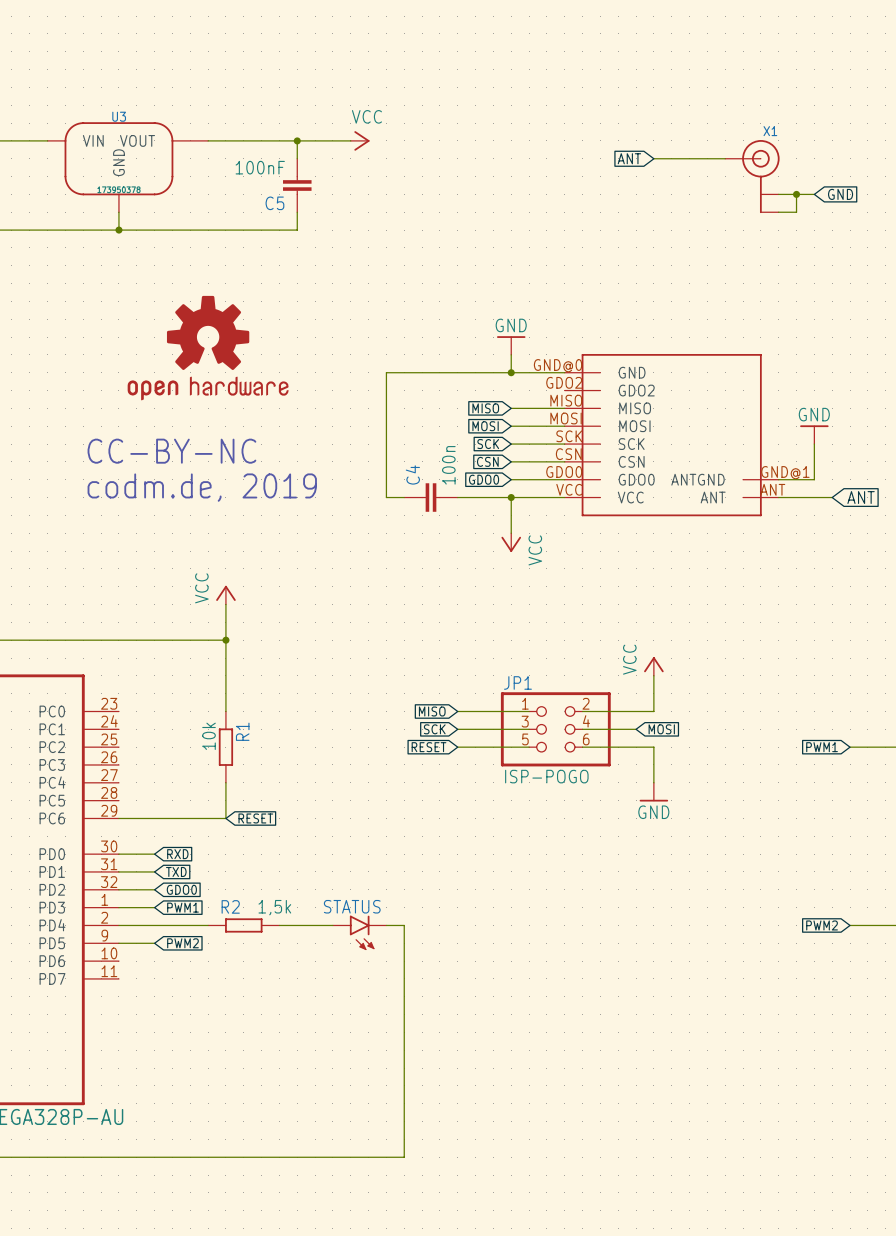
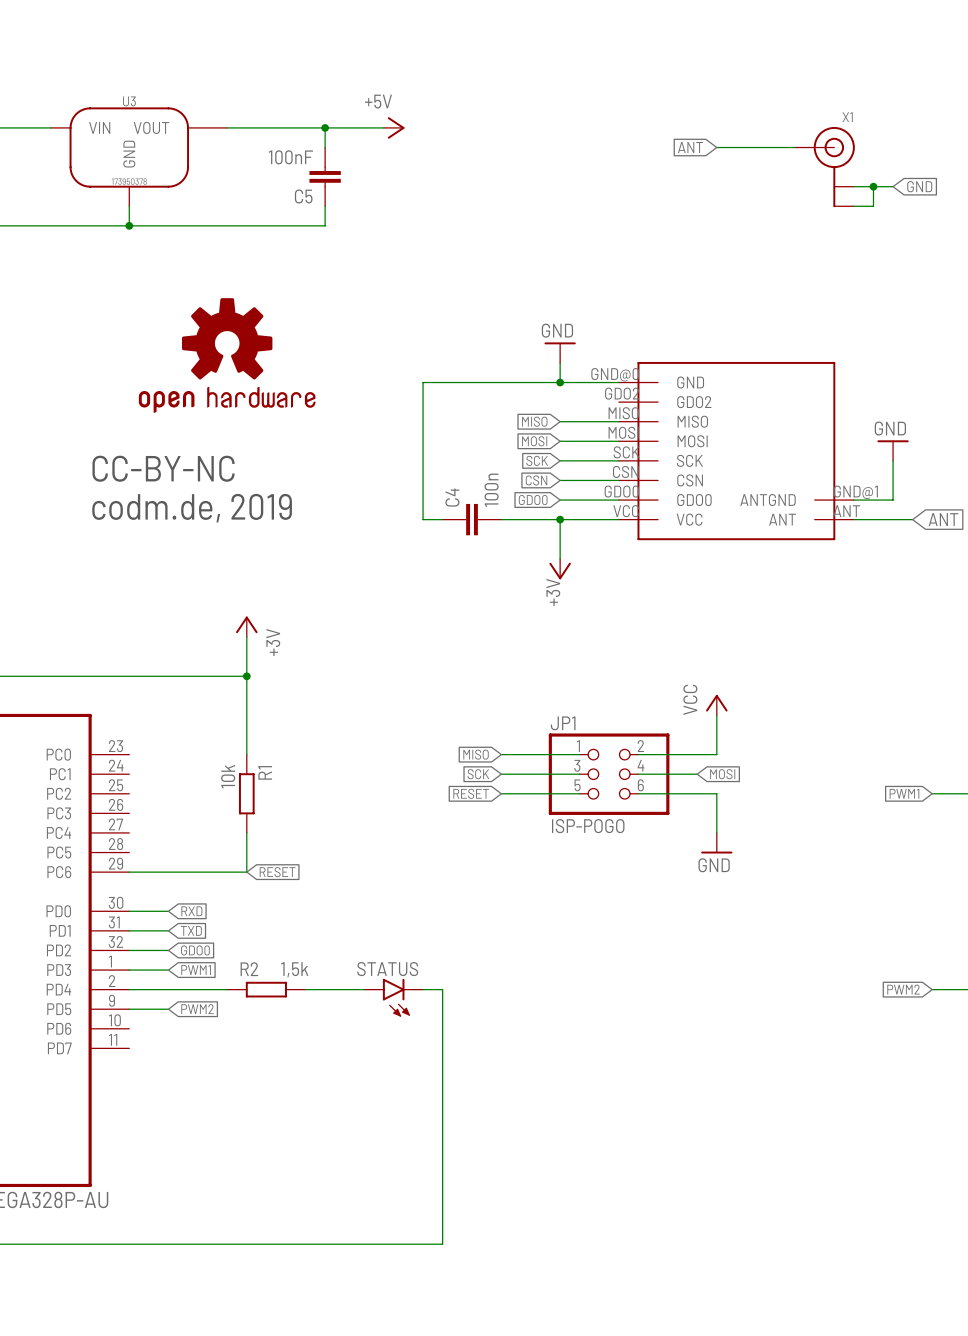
power symbol: VCC (360, 140) -> +5V (394, 127)
power symbol: VCC (511, 542) -> +3V (560, 569)
power symbol: VCC (225, 595) -> +3V (246, 626)

